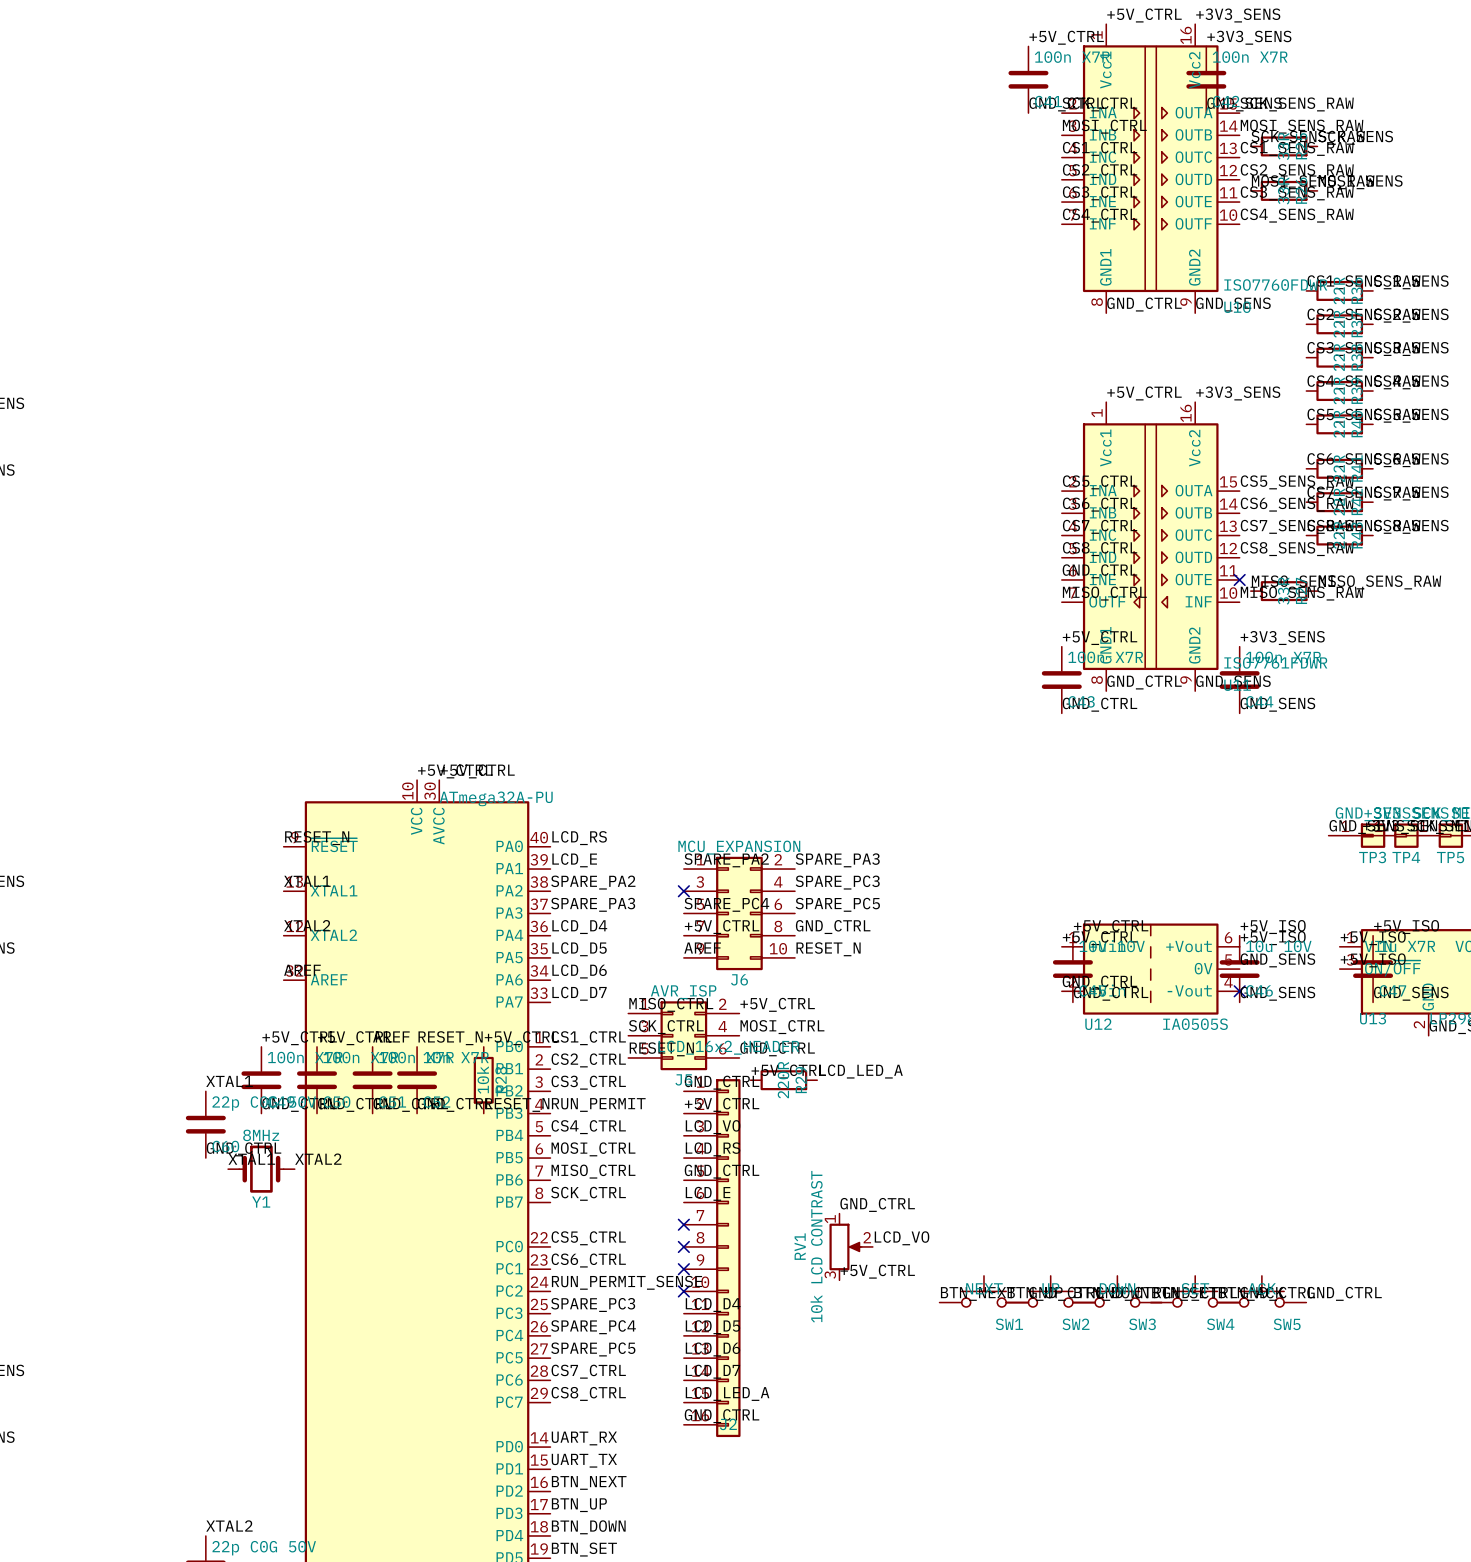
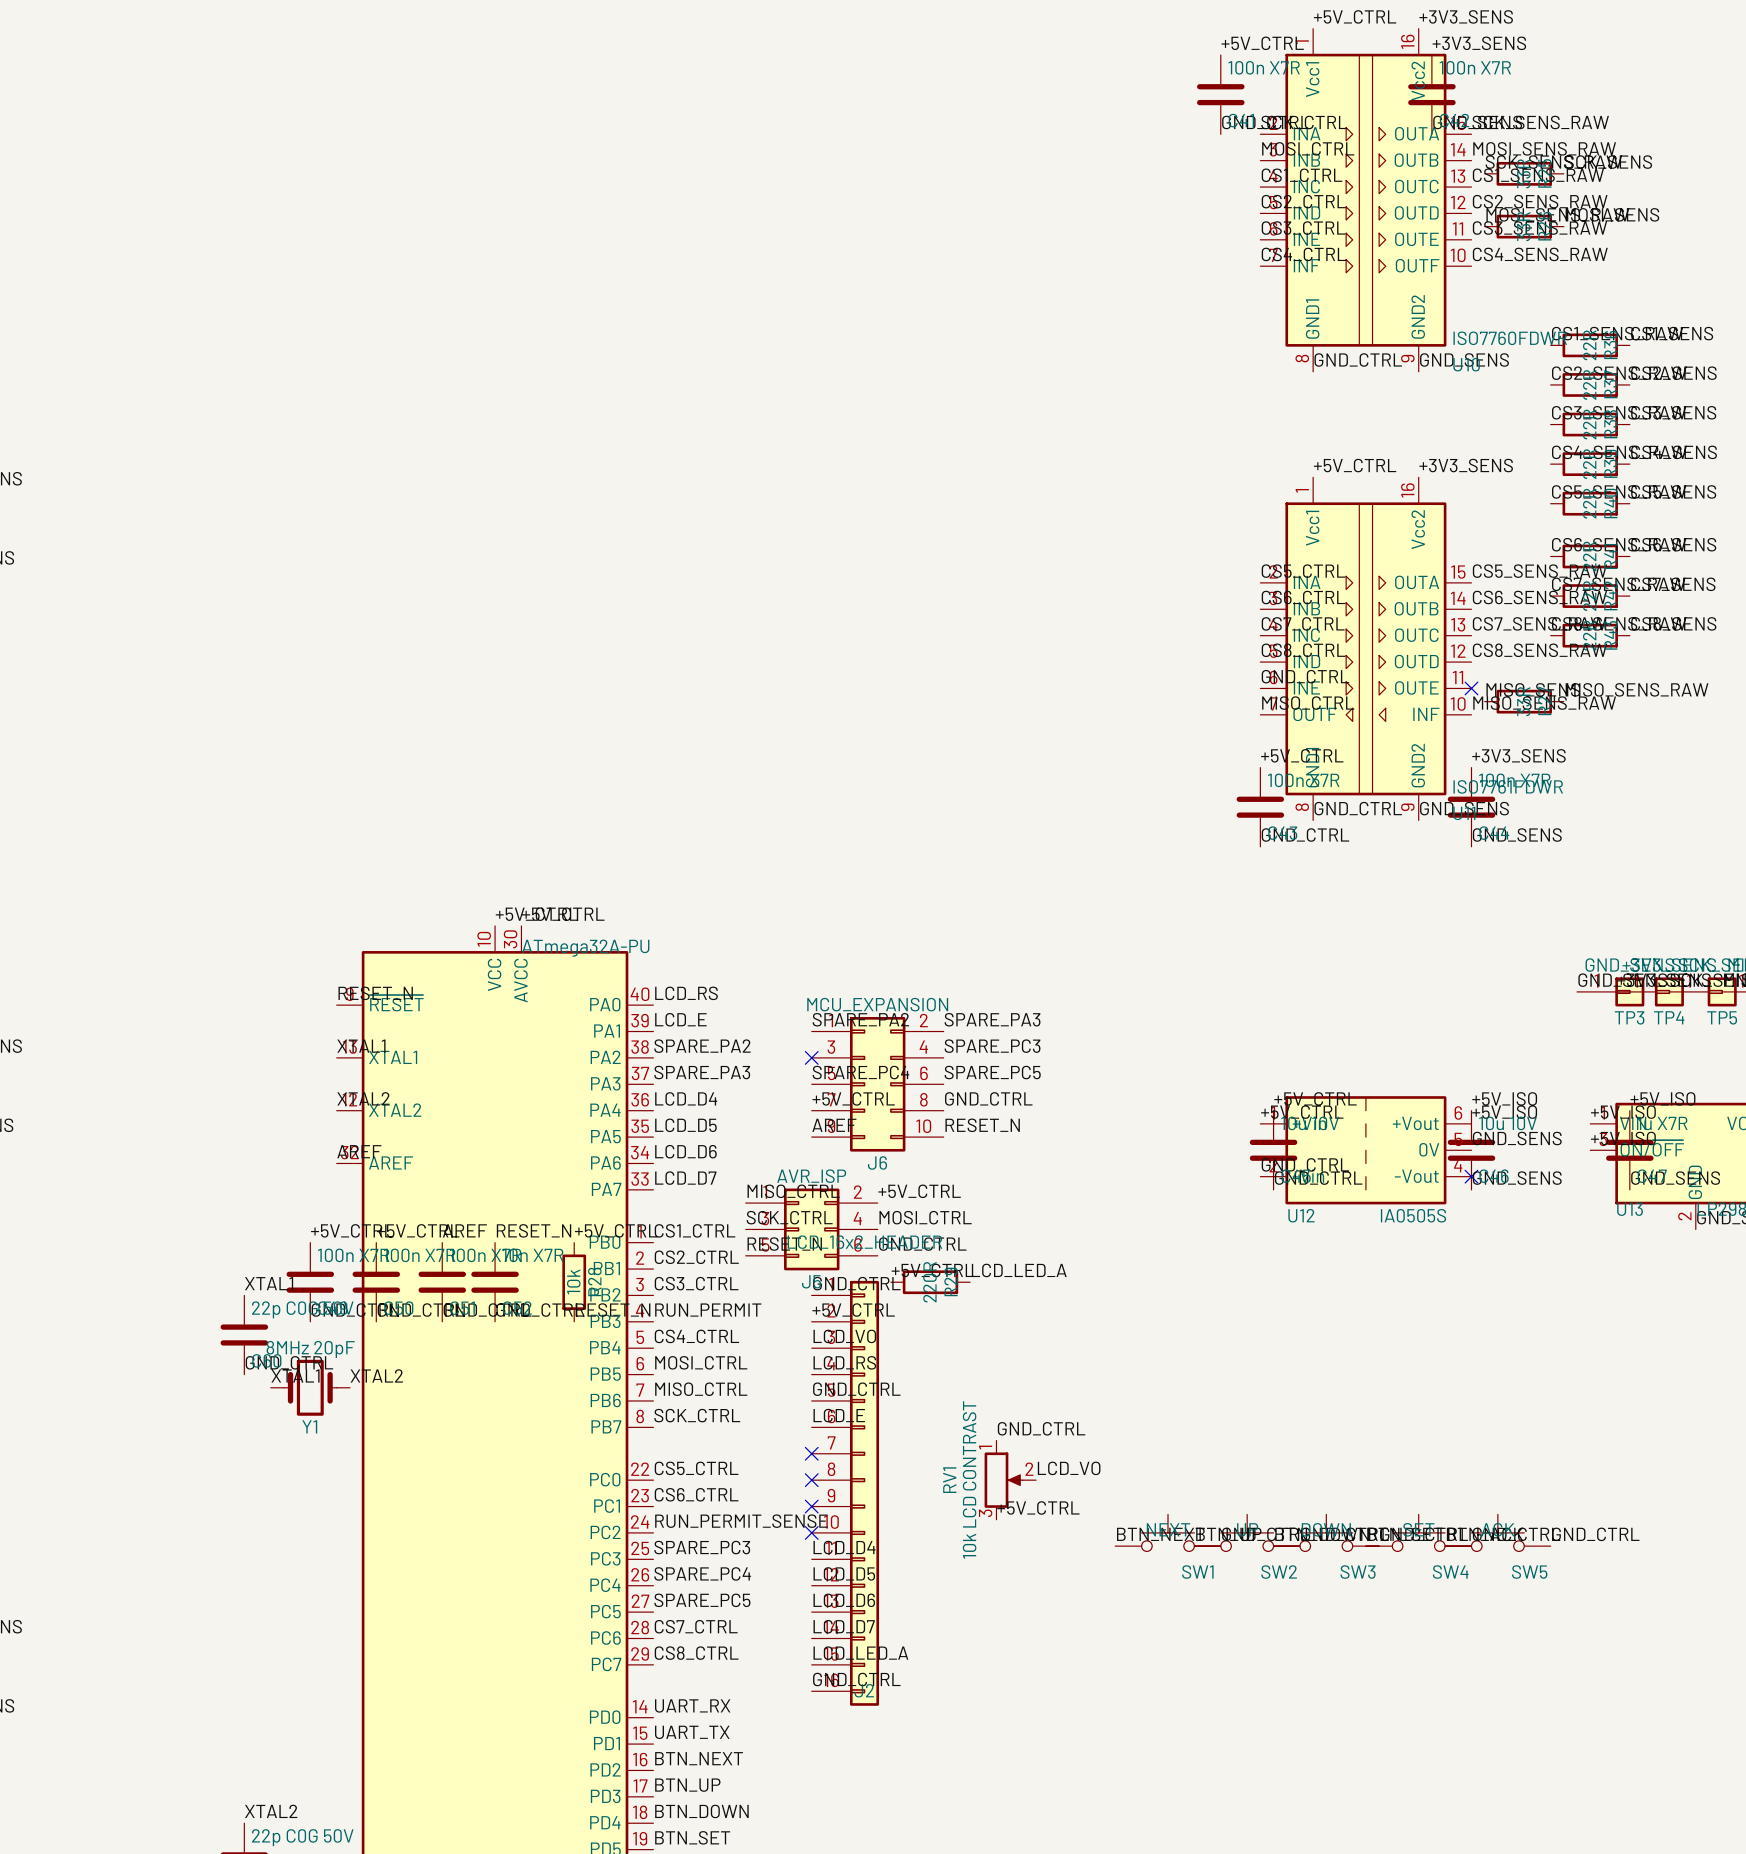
Y1 value: 8MHz (261, 1135) -> 8MHz 20pF (310, 1349)

